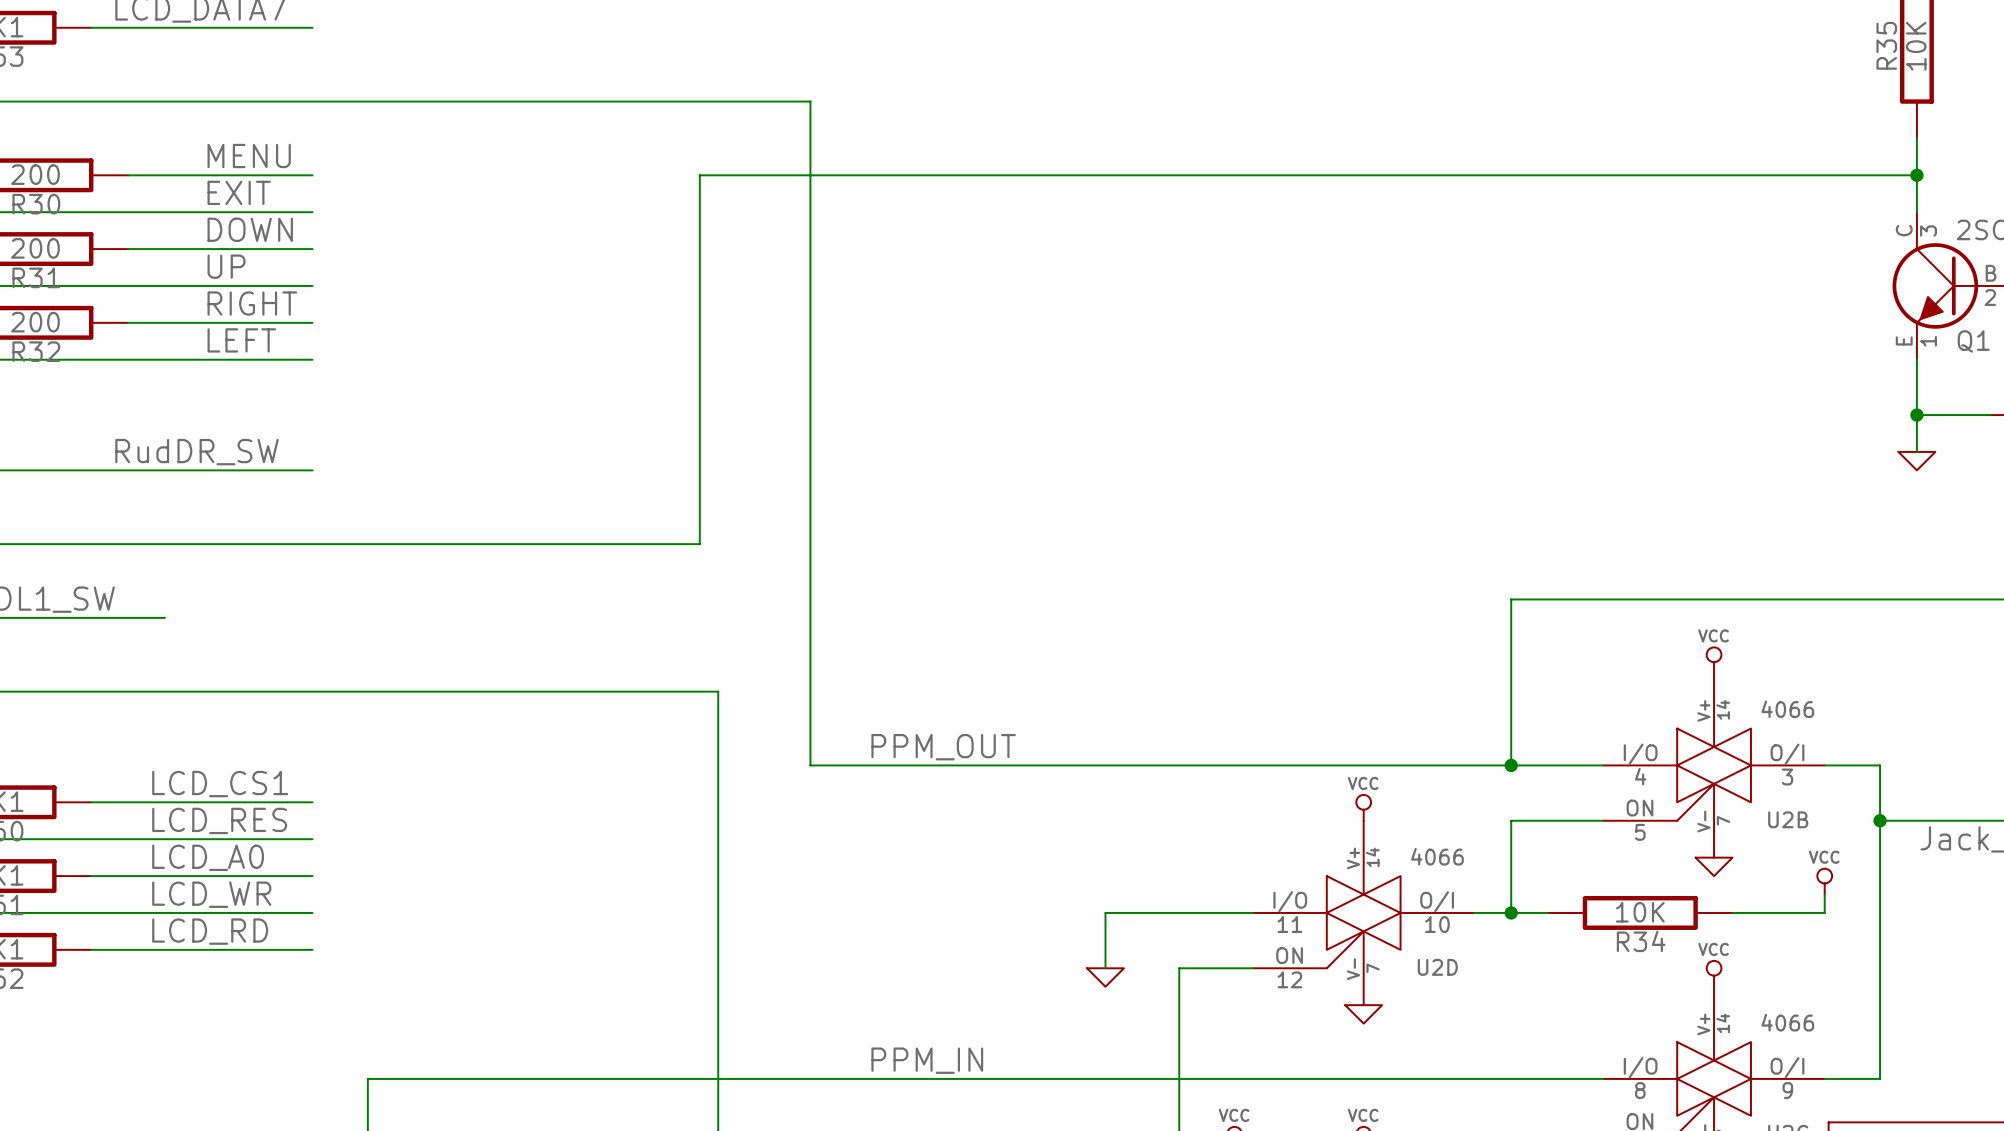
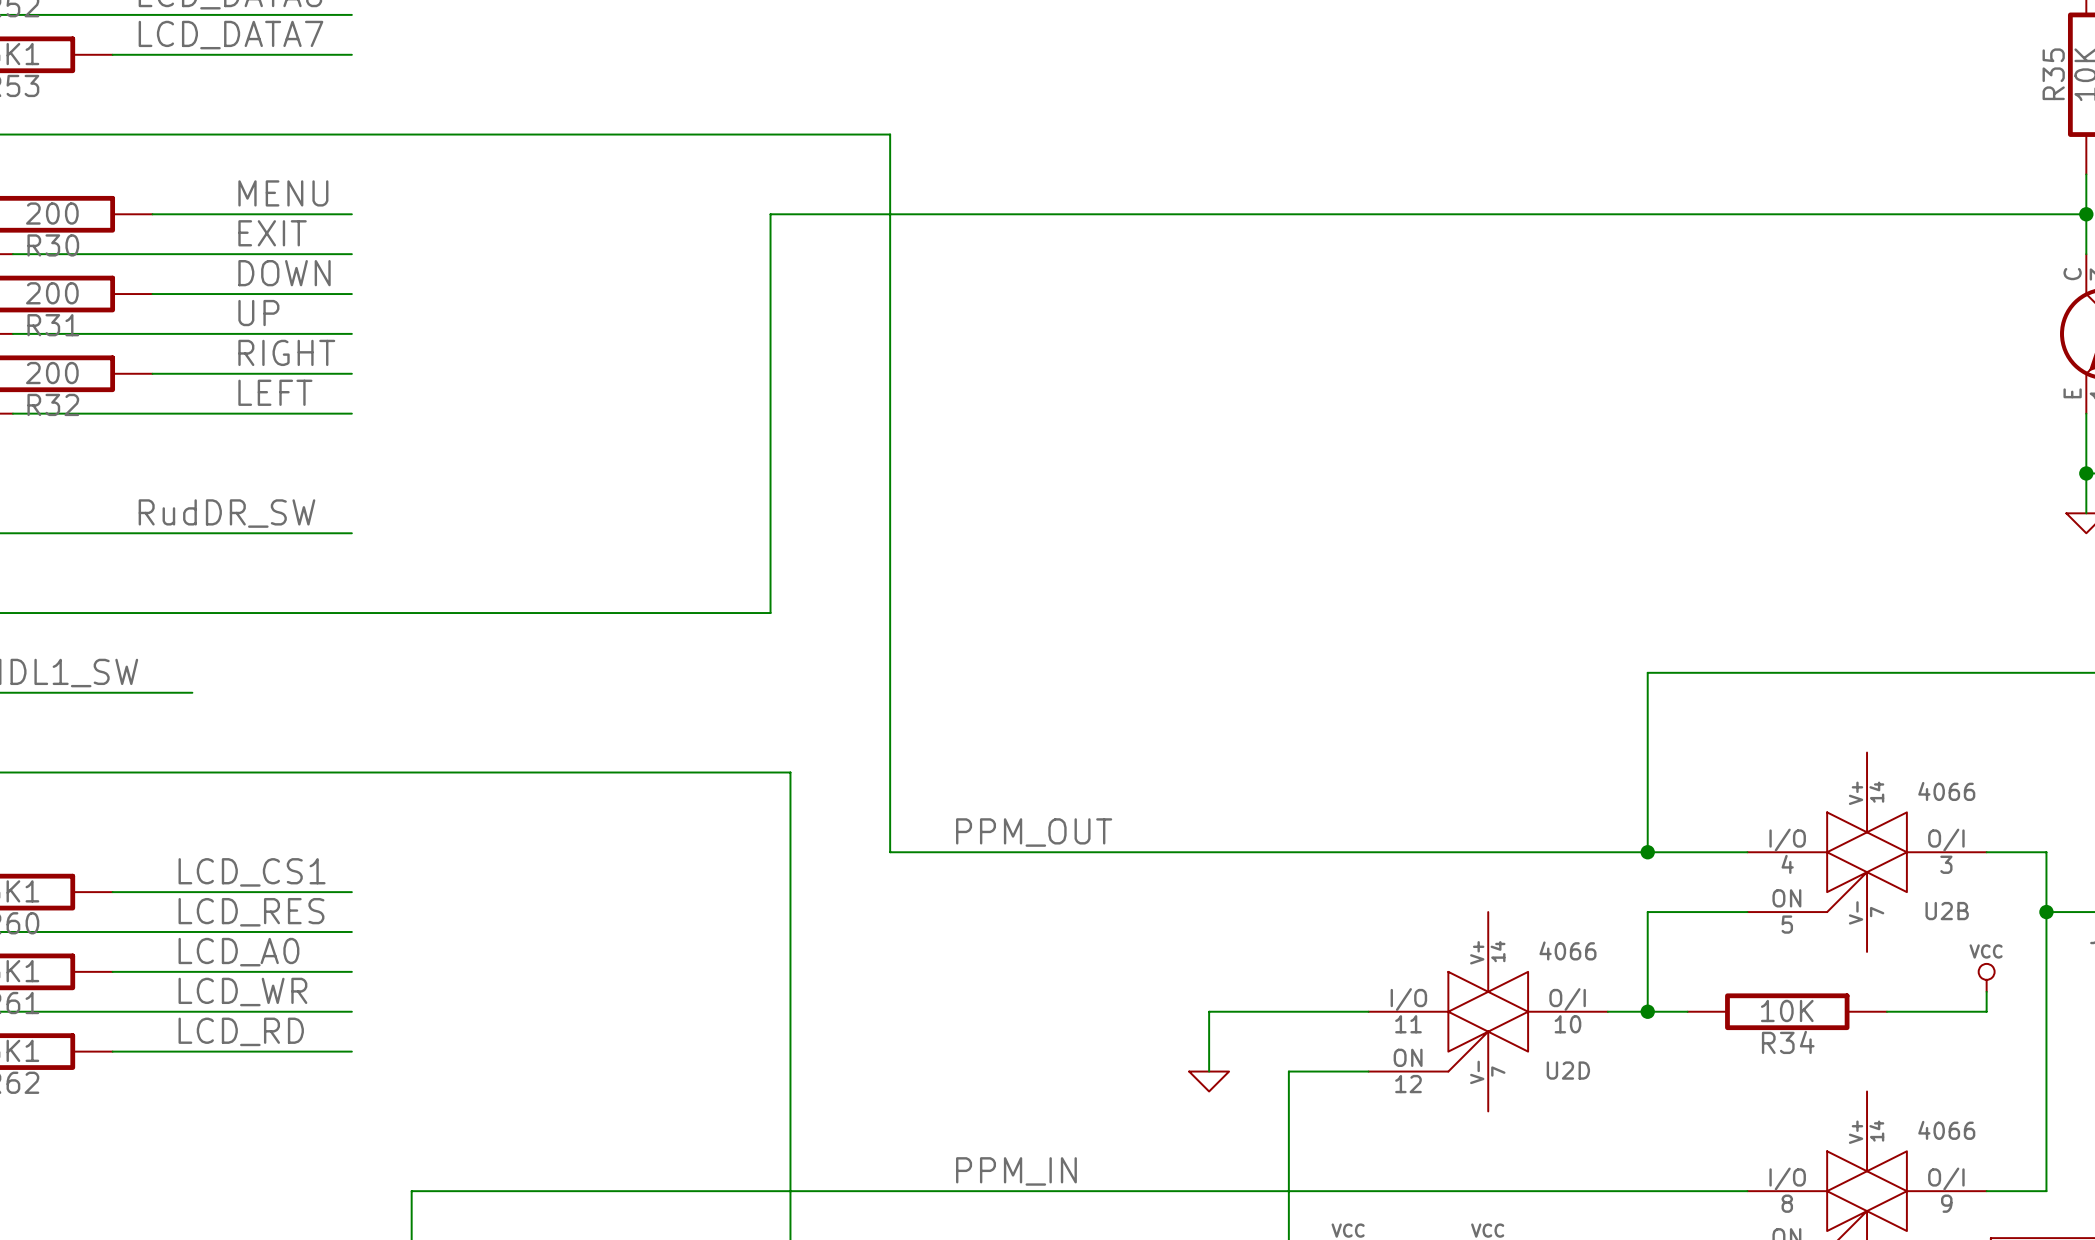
power symbol: VCC (1714, 660) -> none
power symbol: VCC (1363, 807) -> none
power symbol: (1714, 866) -> none
power symbol: VCC (1714, 973) -> none
power symbol: (1363, 1014) -> none

